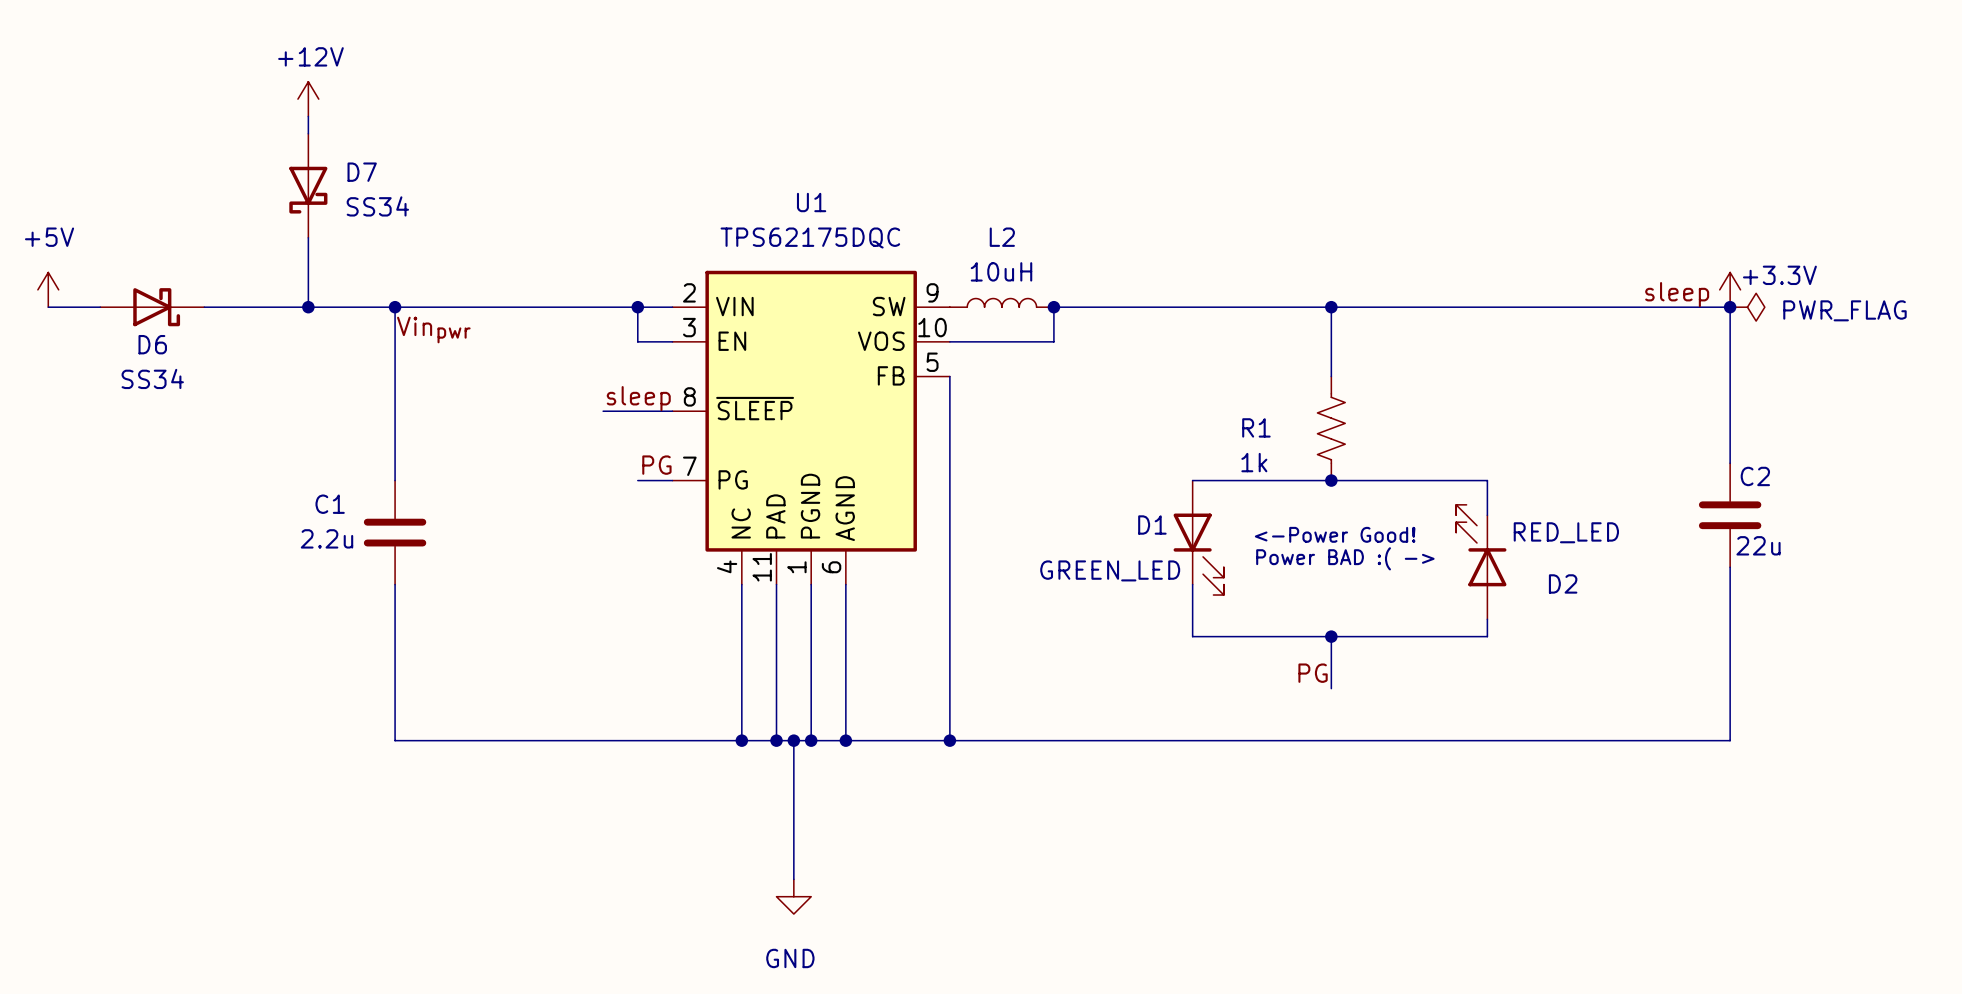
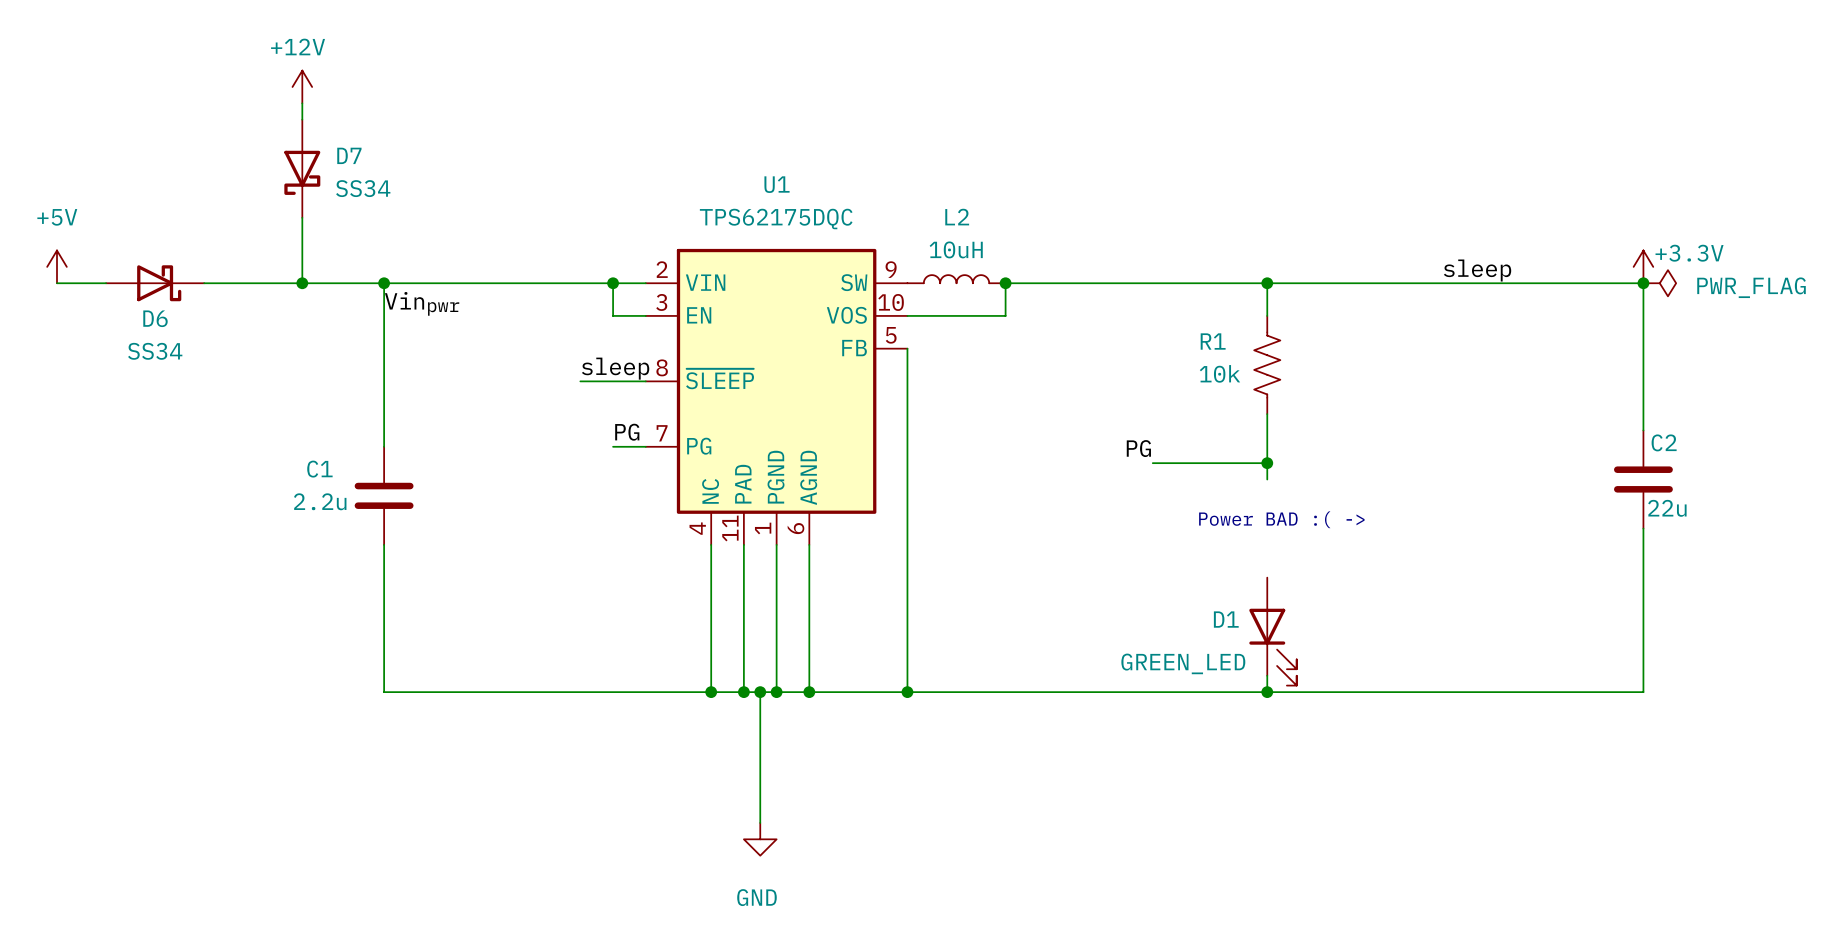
label position: sleep (1677, 294) -> sleep (1477, 270)
R1 name position: R1 (1256, 427) -> R1 (1213, 341)
R1 position: (1331, 428) -> (1267, 365)
wire: none -> (1267, 414) (1267, 479)
R1 value: 1k (1254, 462) -> 10k (1219, 373)
wire: (1192, 480) (1487, 480) (1487, 515) -> none
junction position: (1331, 480) -> (1267, 463)
wire: none -> (1152, 463) (1267, 463)
text: <-Power Good! (1335, 534) -> none
D1 position: (1198, 537) -> (1272, 631)
D2: RED_LED (1481, 562) -> none
wire: (1192, 584) (1192, 636) (1487, 636) (1487, 619) -> none
junction: (1331, 636) -> none
label position: PG (1313, 673) -> PG (1138, 448)
wire: none -> (1267, 675) (1267, 692)
junction: none -> (1267, 692)

